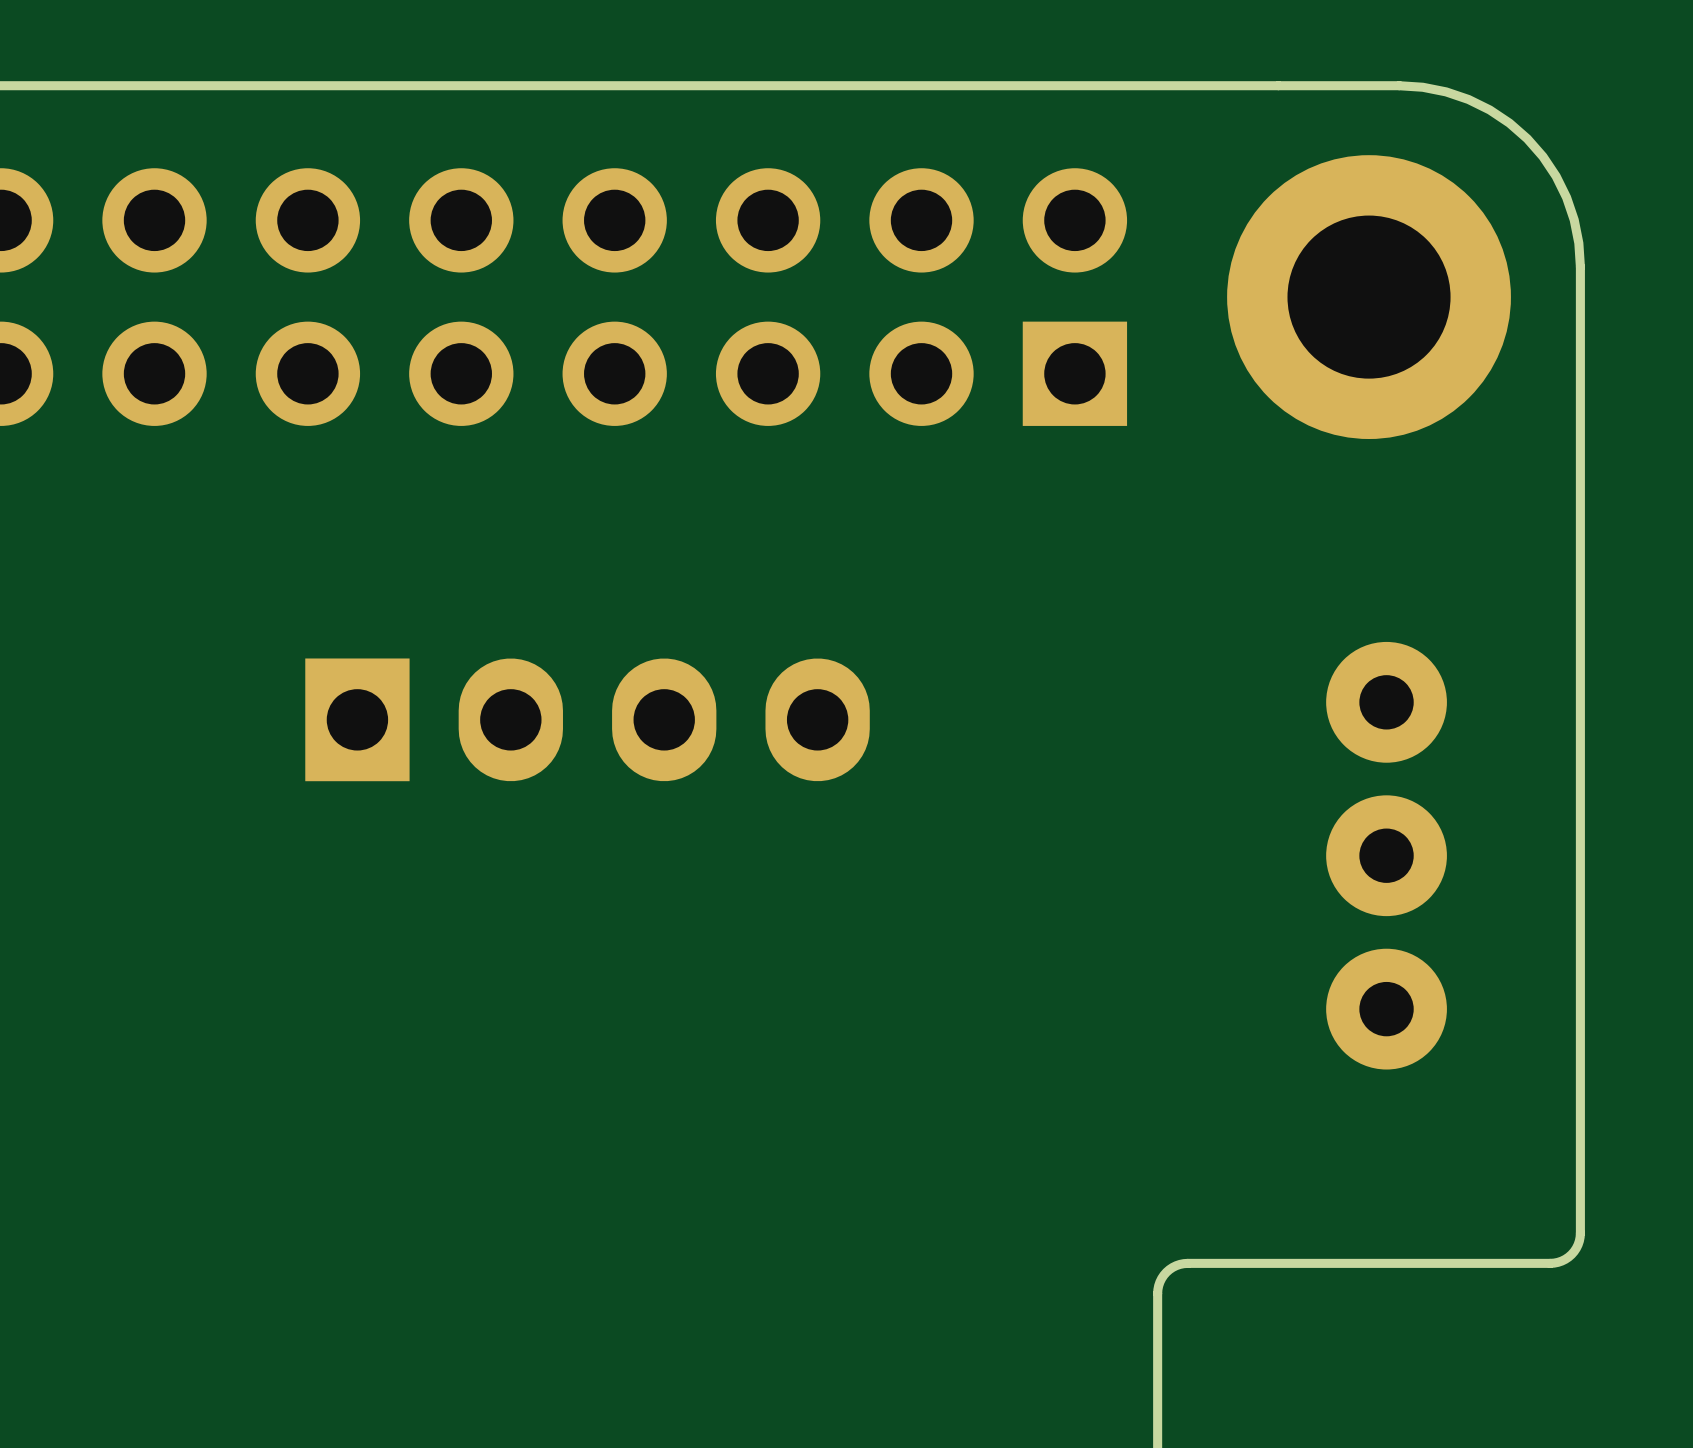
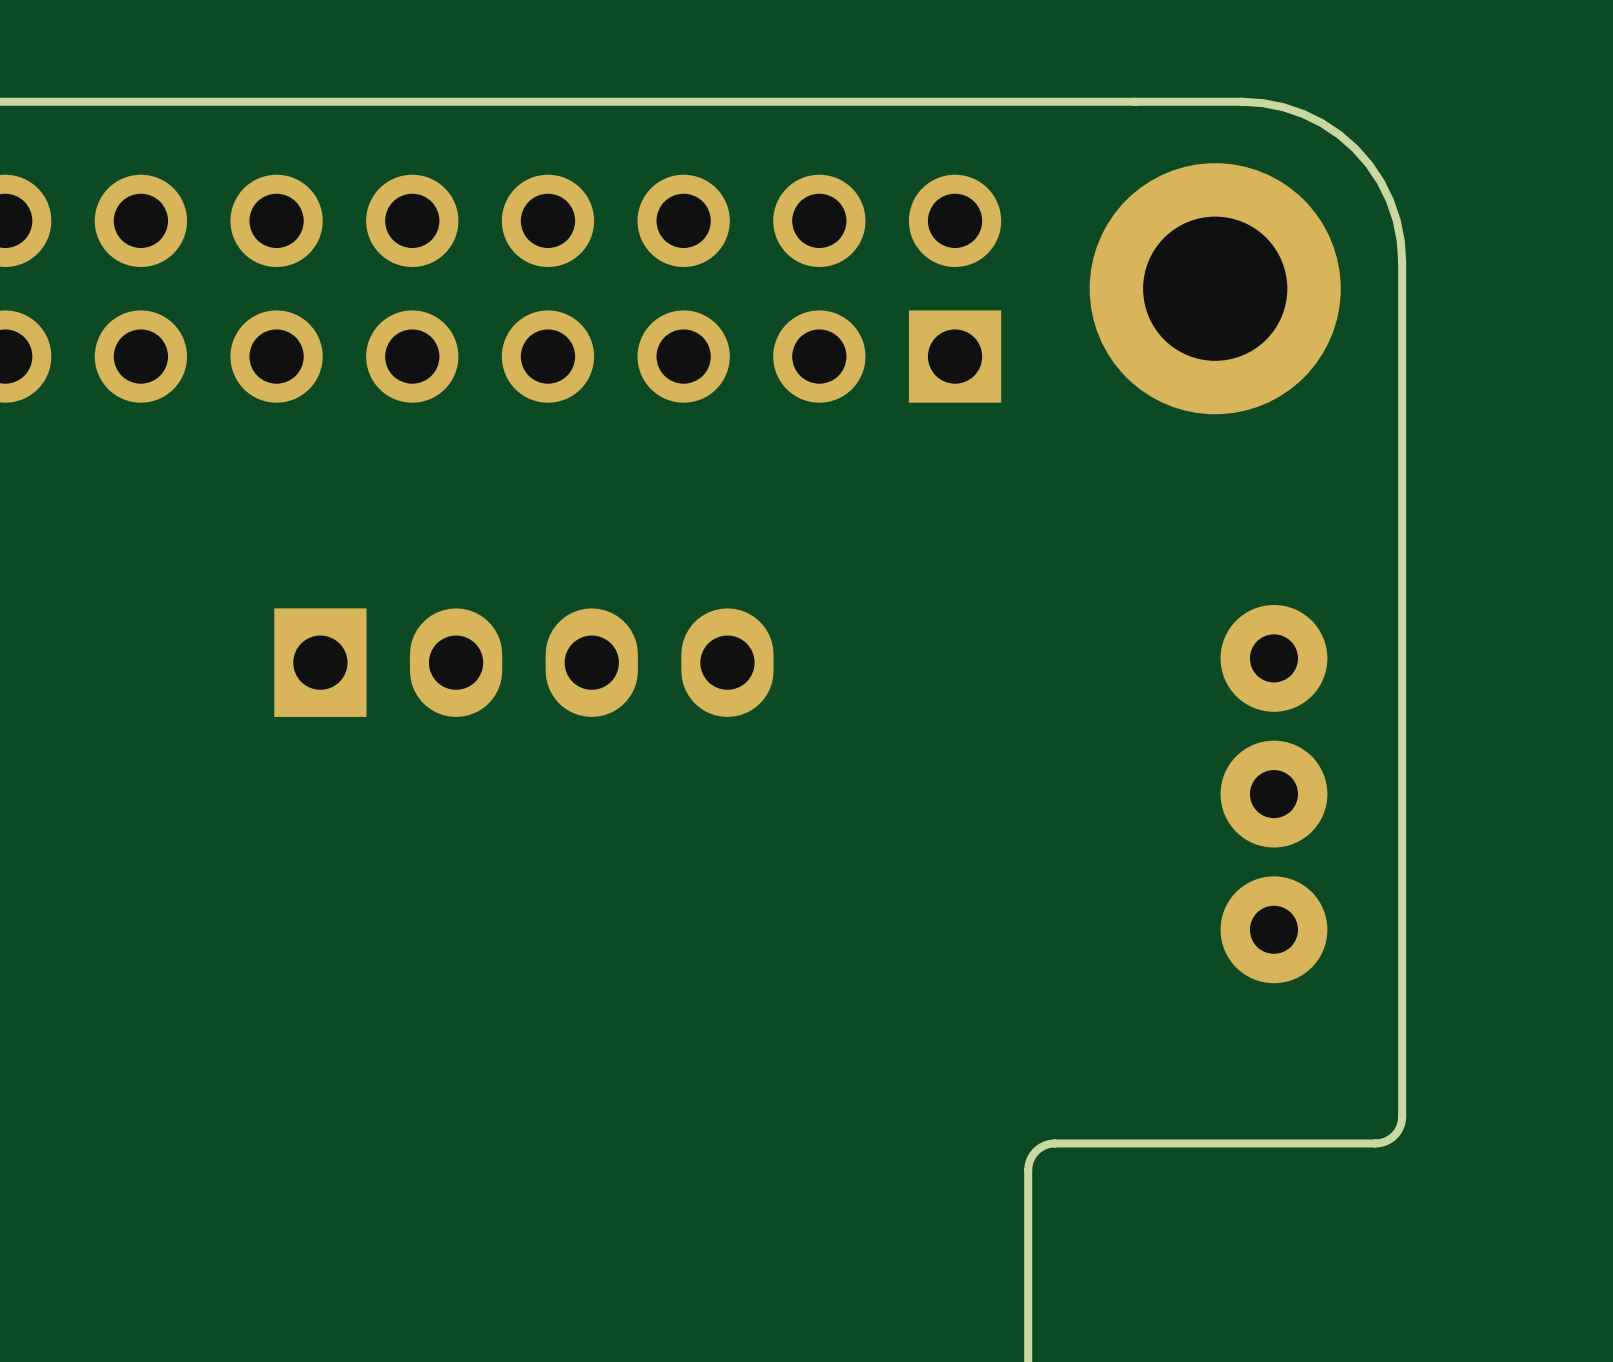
part position: (1386, 855) -> (1273, 794)

